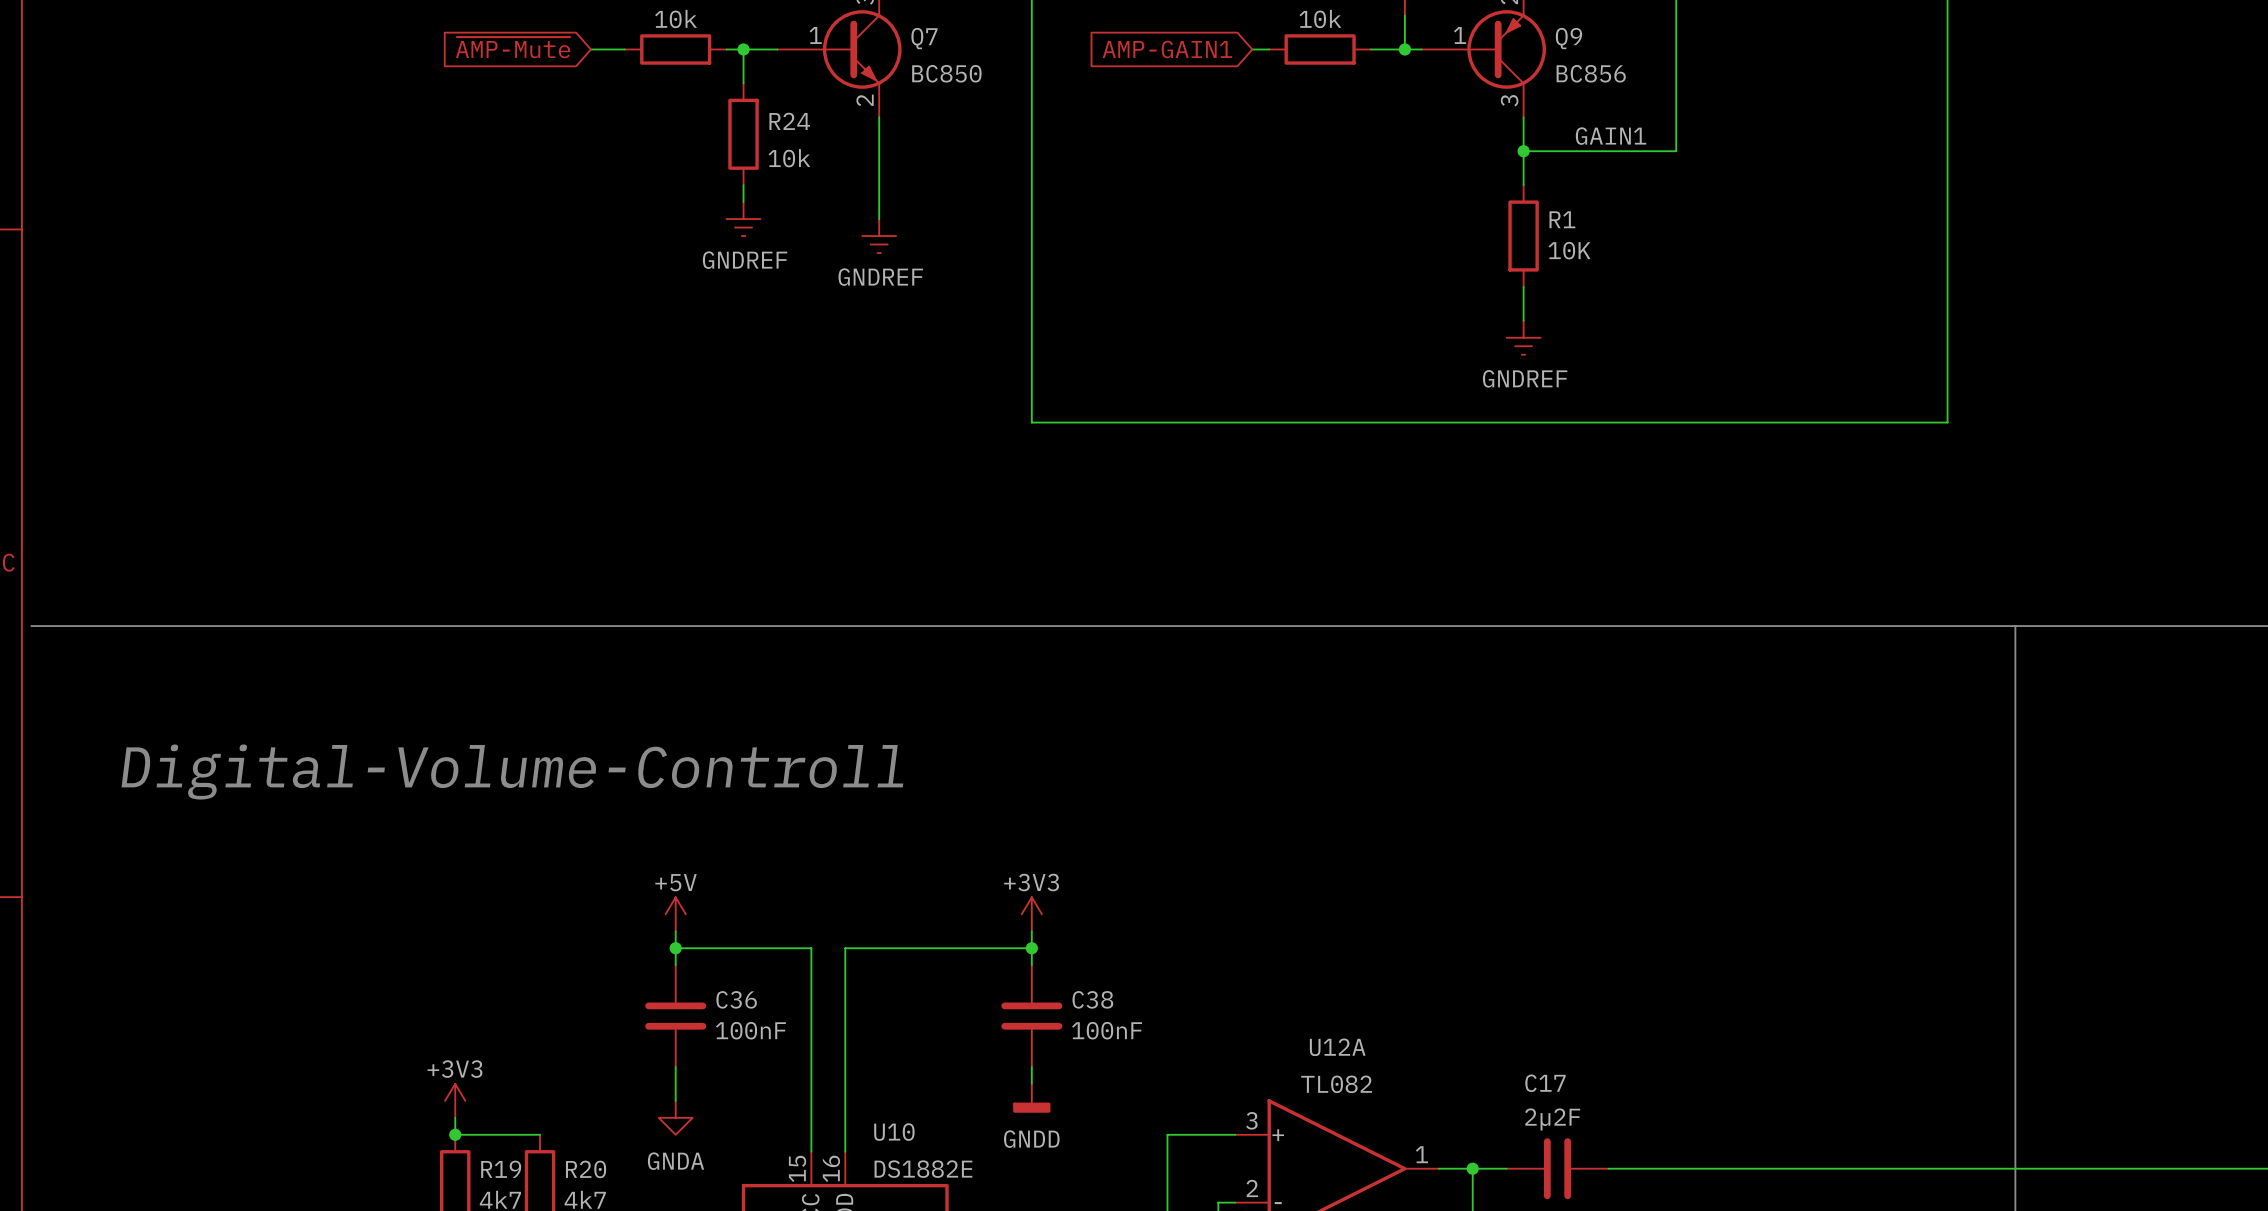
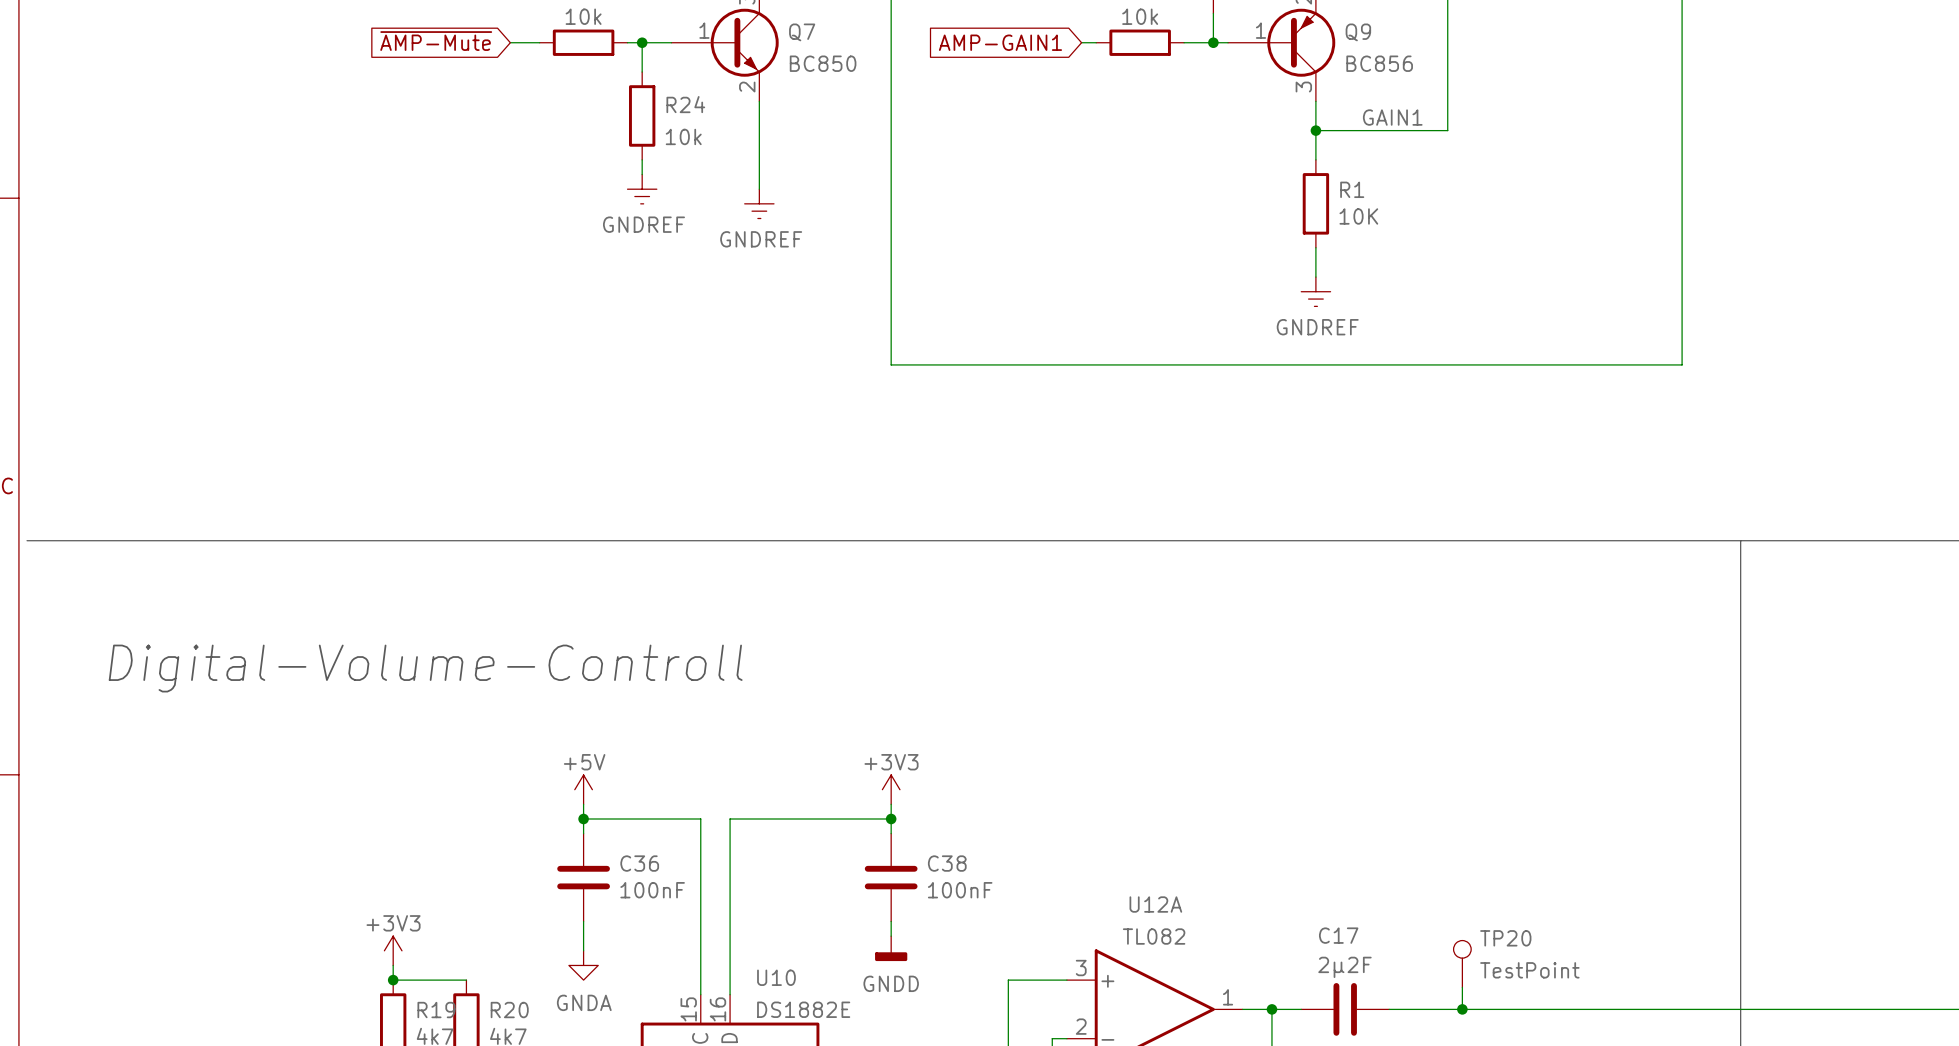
TP20: none -> TestPoint (1462, 963)
wire: none -> (1462, 987) (1462, 1009)
junction: none -> (1462, 1009)

